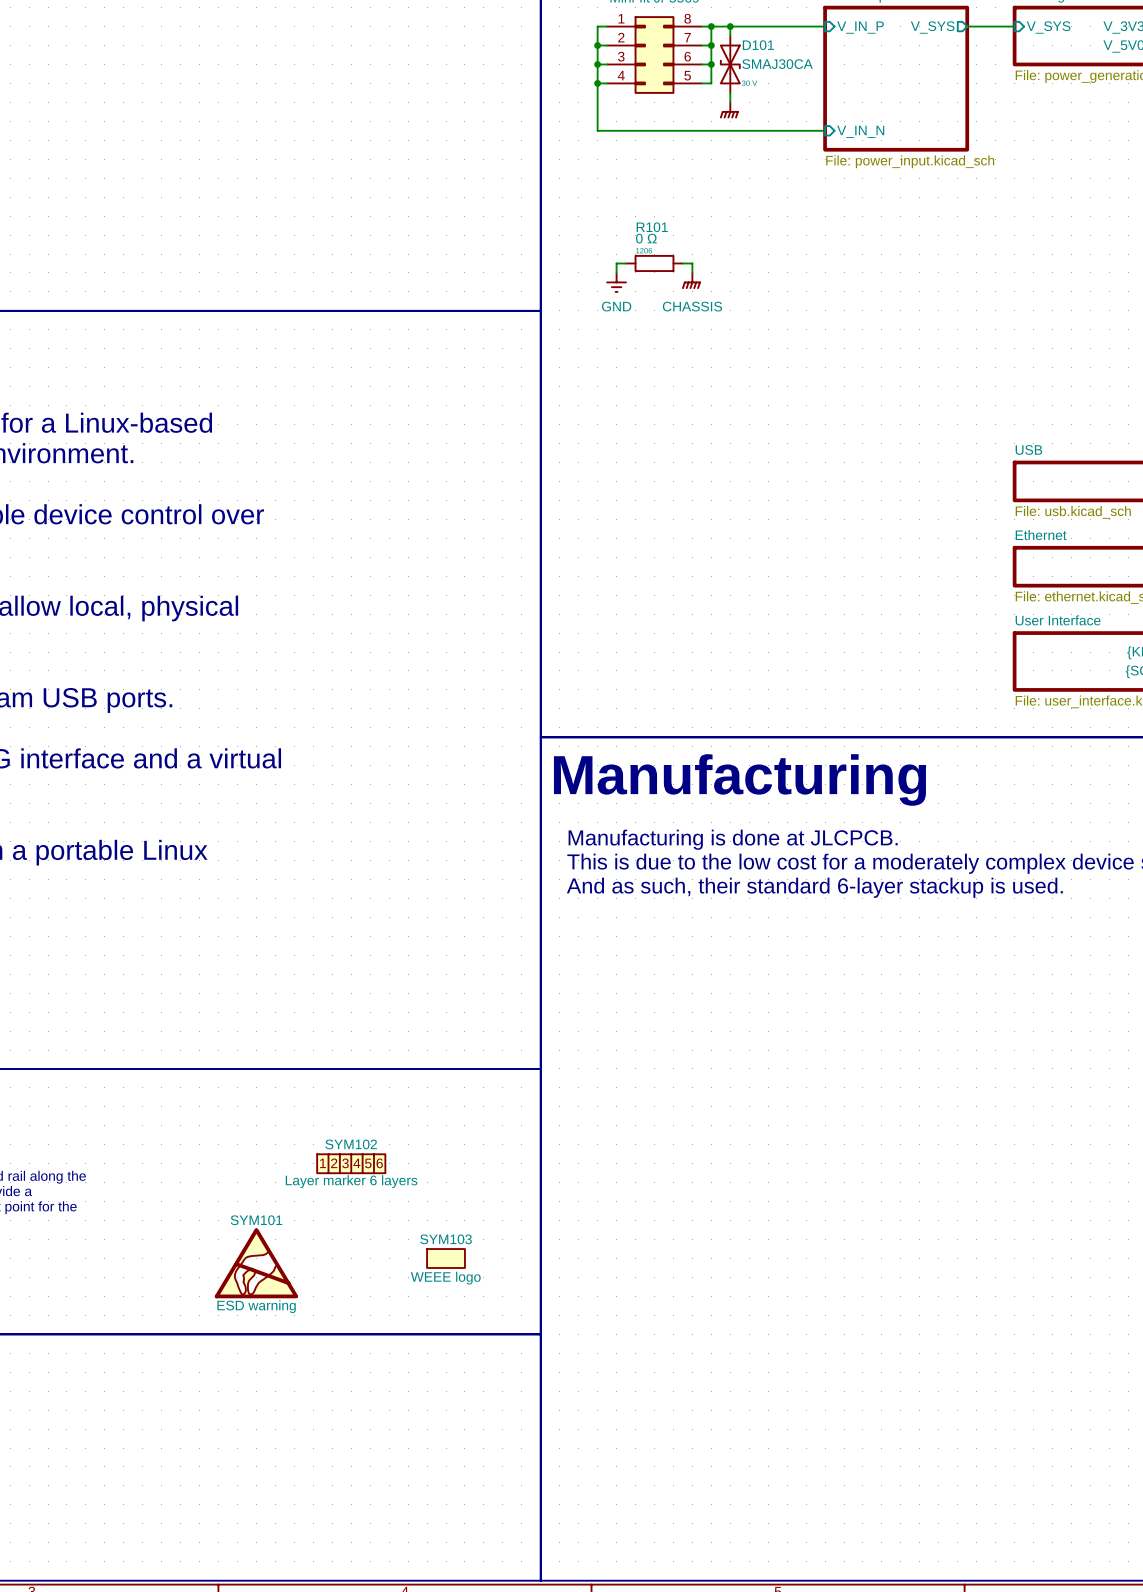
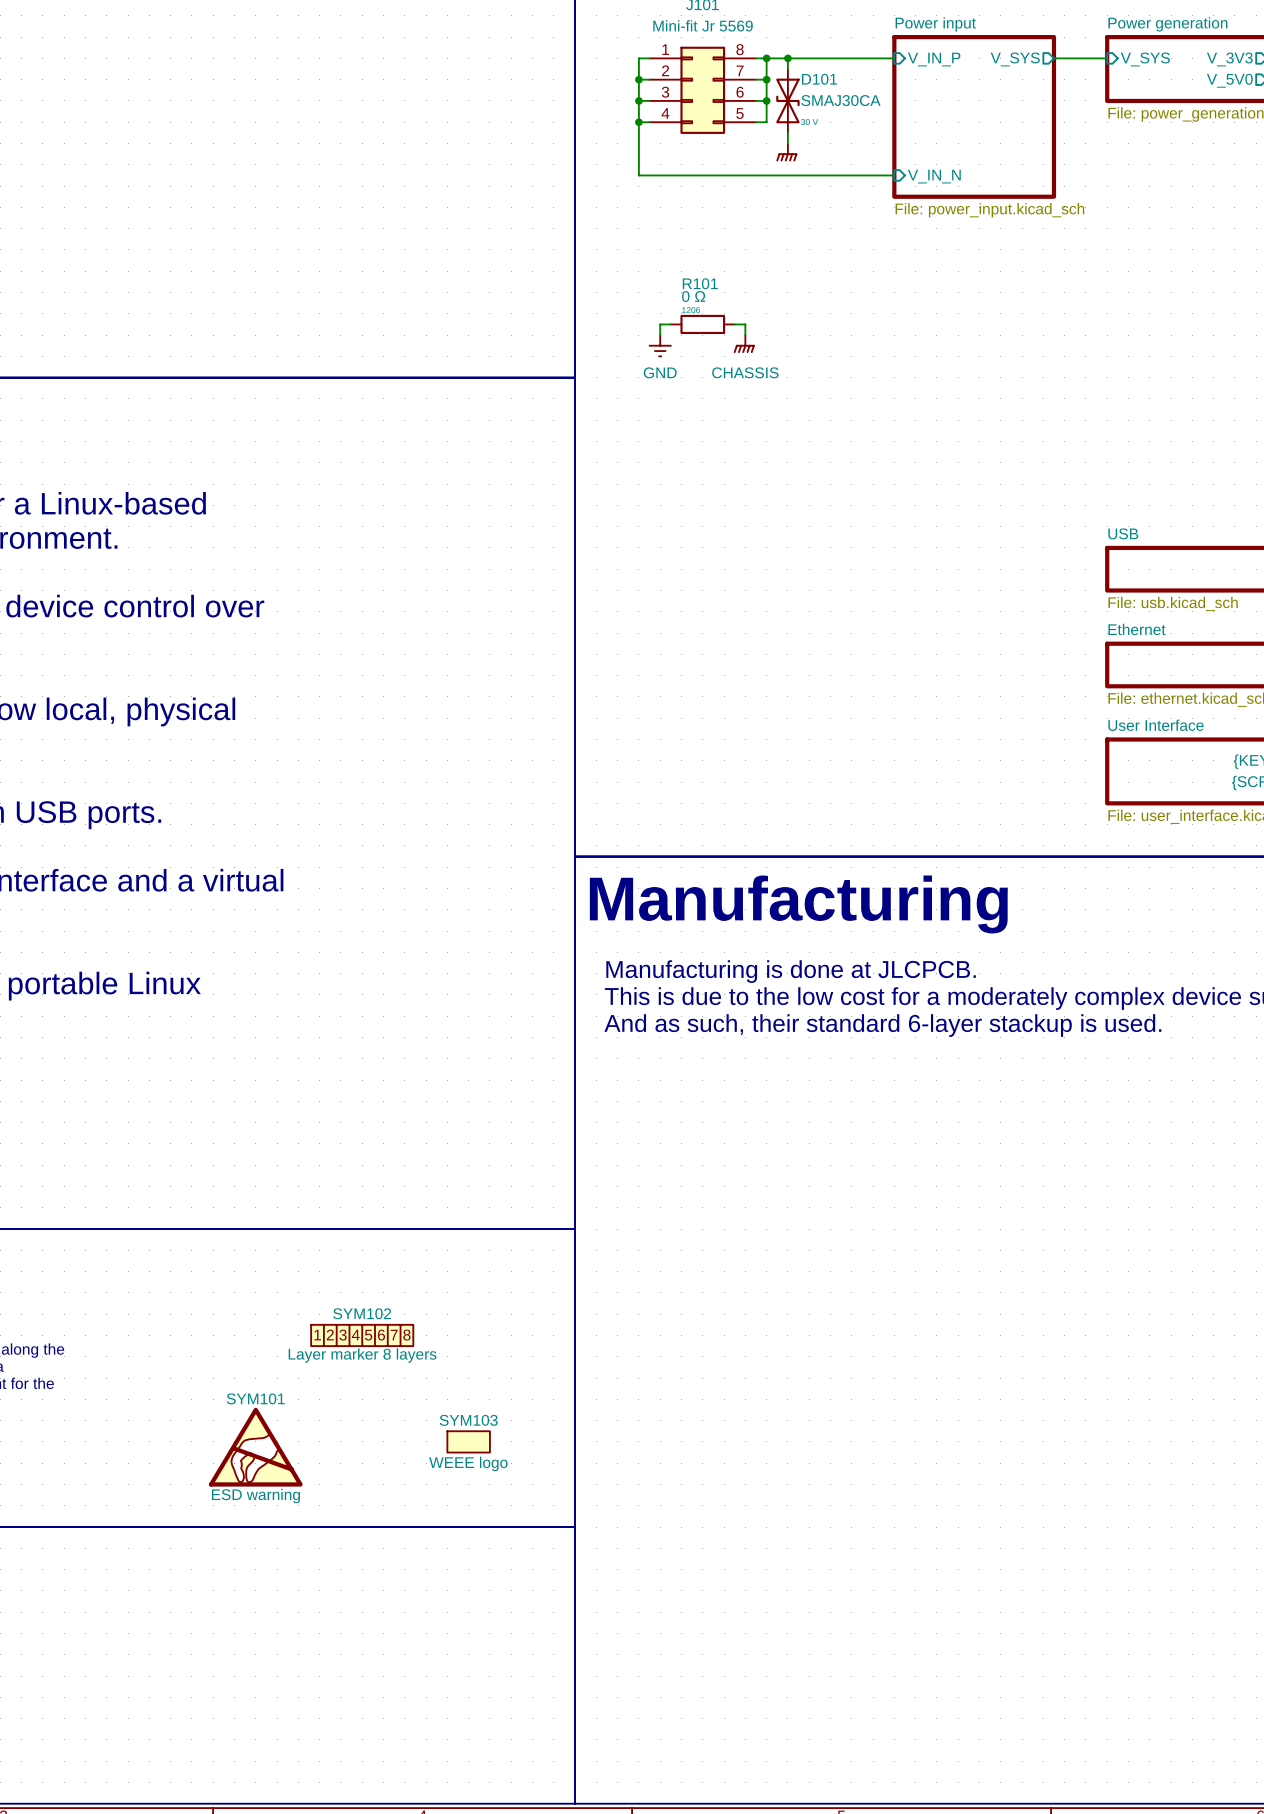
SYM102 symbol: [317, 1154, 386, 1174] -> [311, 1324, 414, 1347]
SYM102 value: Layer marker 6 layers (351, 1181) -> Layer marker 8 layers (362, 1355)

